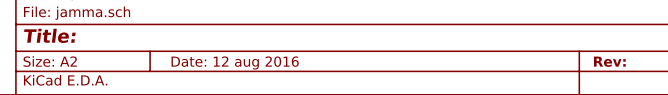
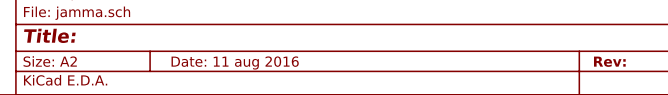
title block: Date: 12 aug 2016 (235, 62) -> Date: 11 aug 2016 (235, 62)

